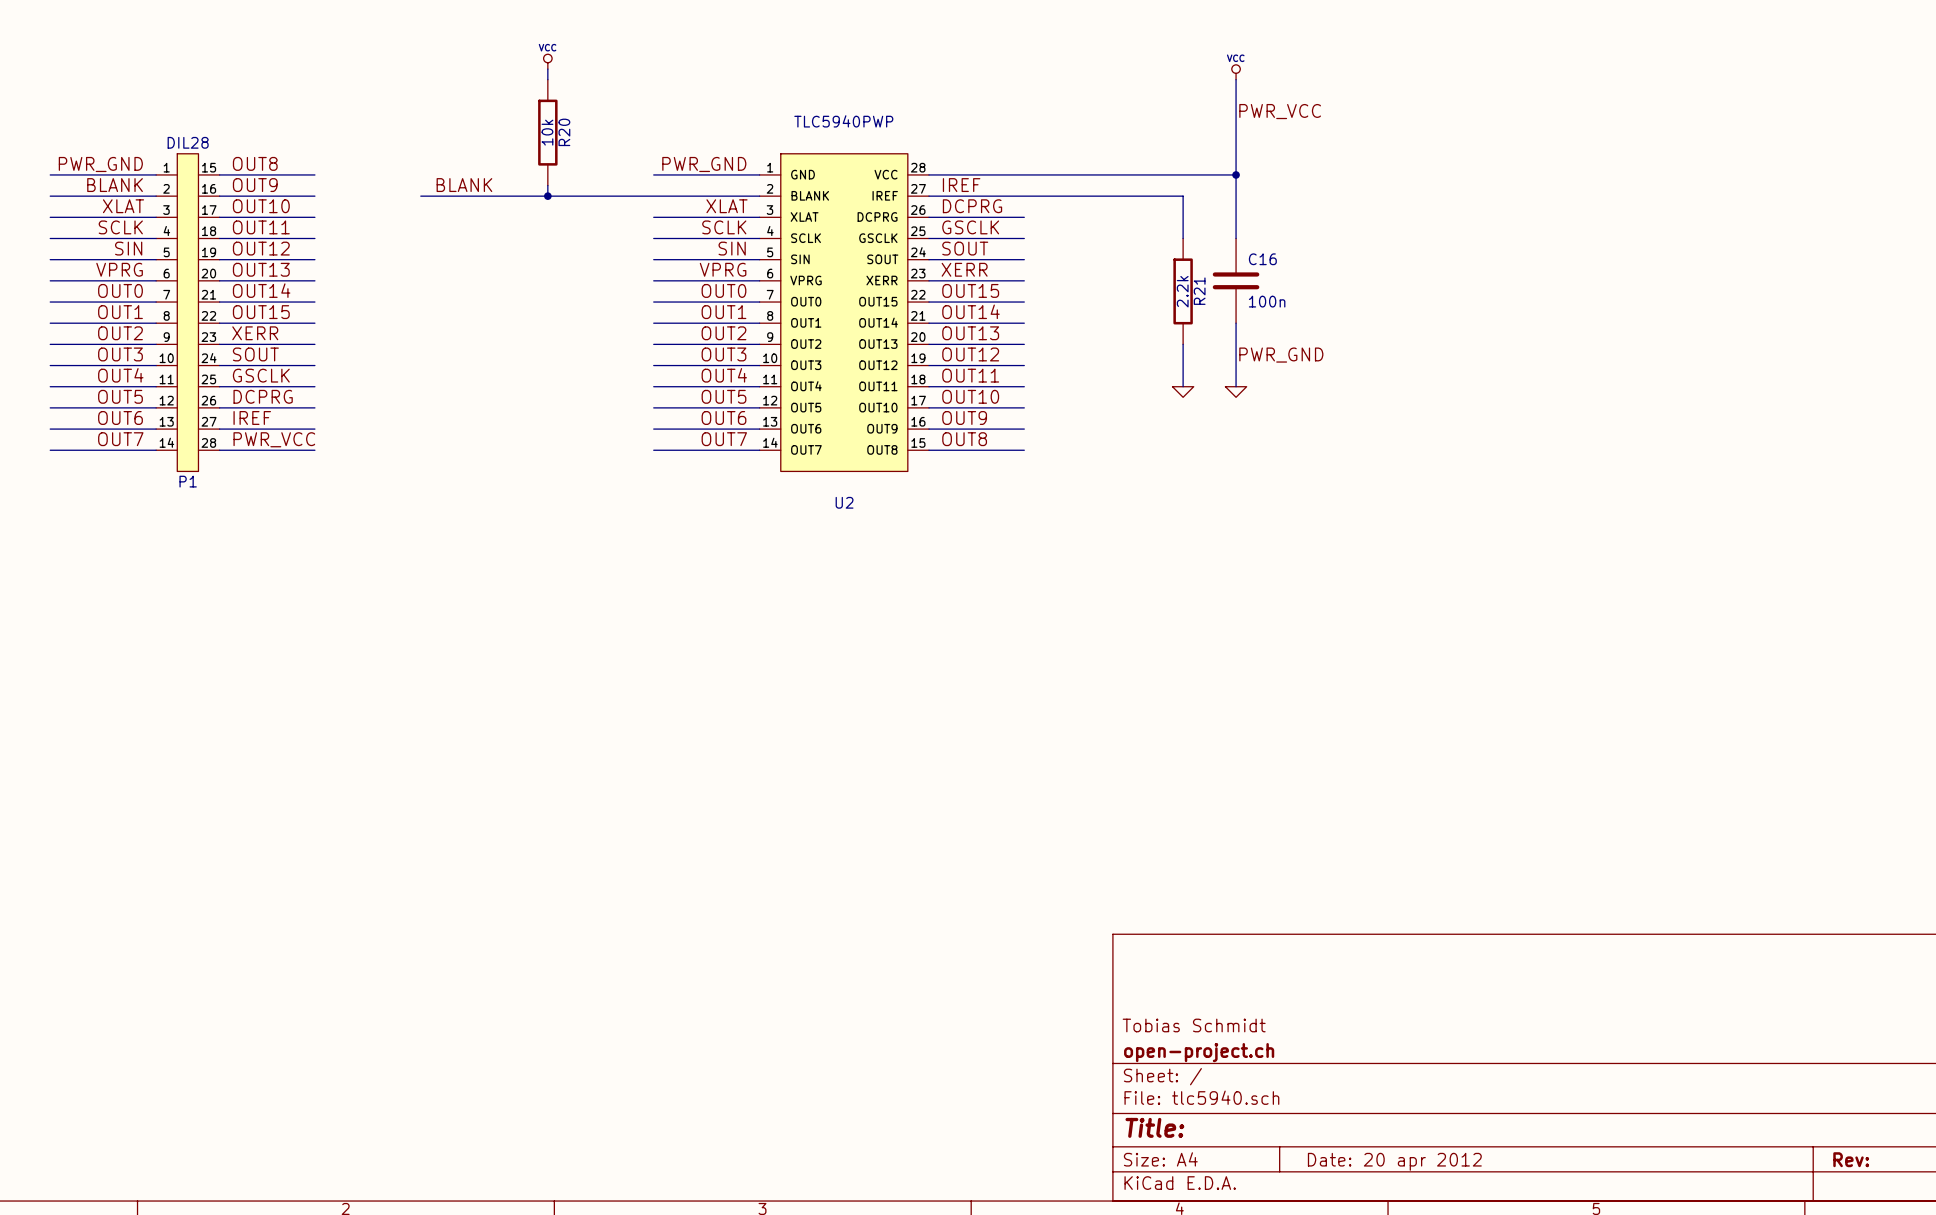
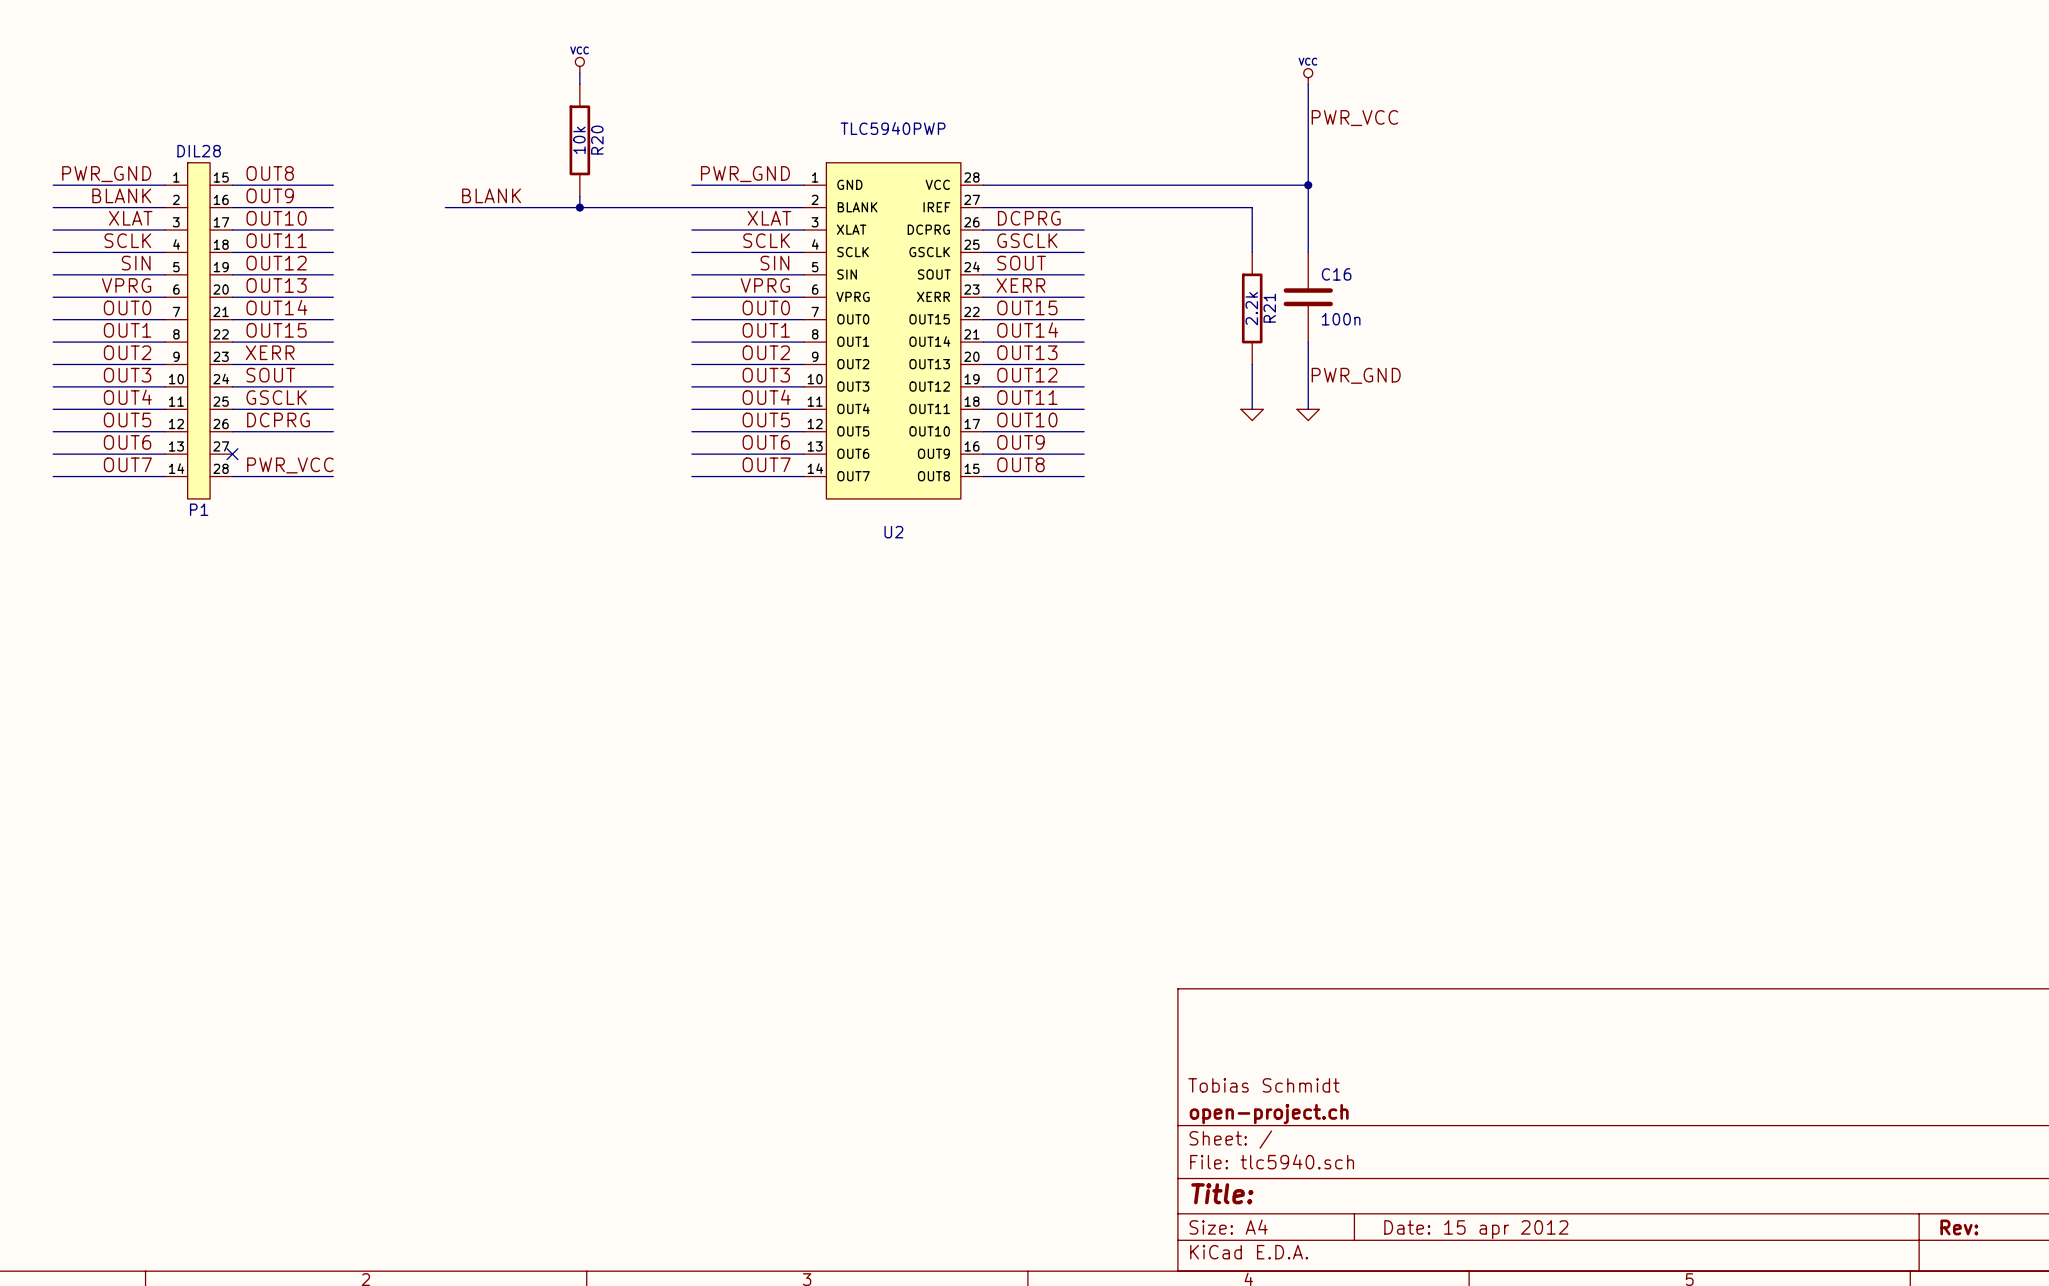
label: IREF (961, 185) -> none
label: IREF (252, 417) -> none
wire: (219, 429) (314, 429) -> none
no-connect mark: none -> (232, 454)
title block: Date: 20 apr 2012 (1394, 1161) -> Date: 15 apr 2012 (1476, 1229)

